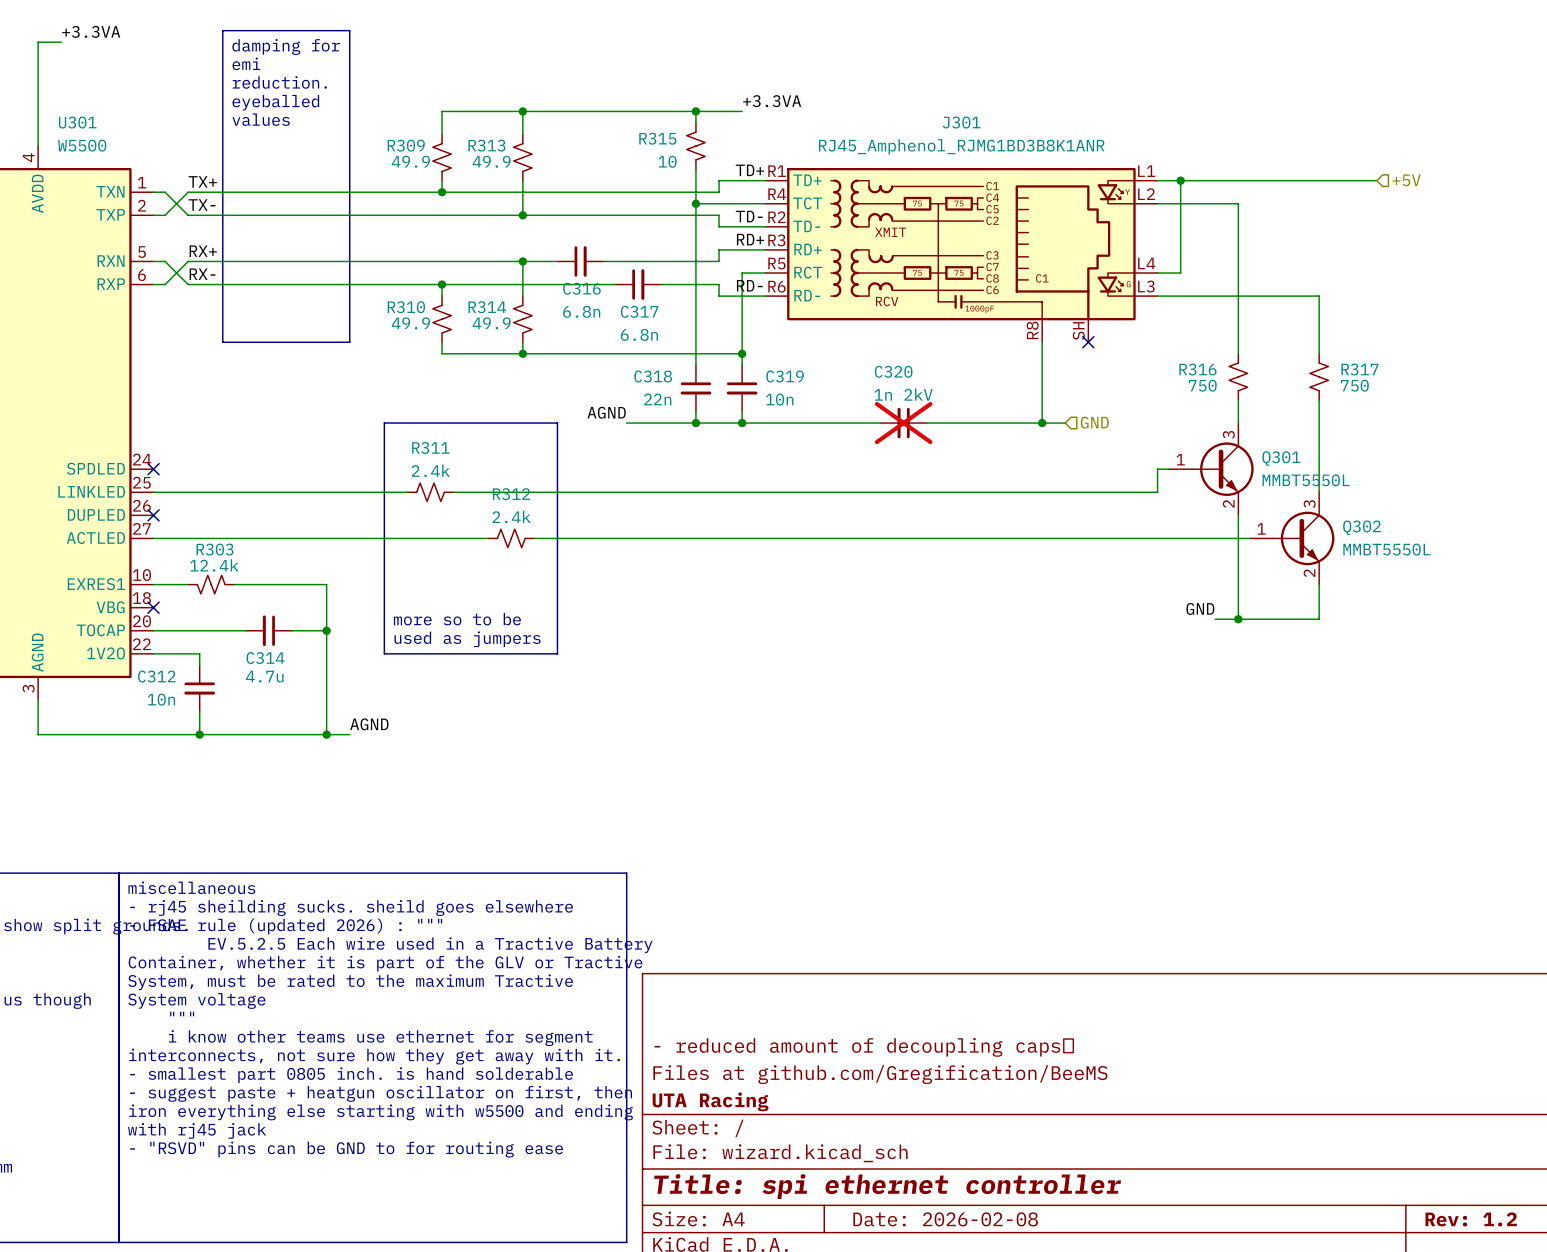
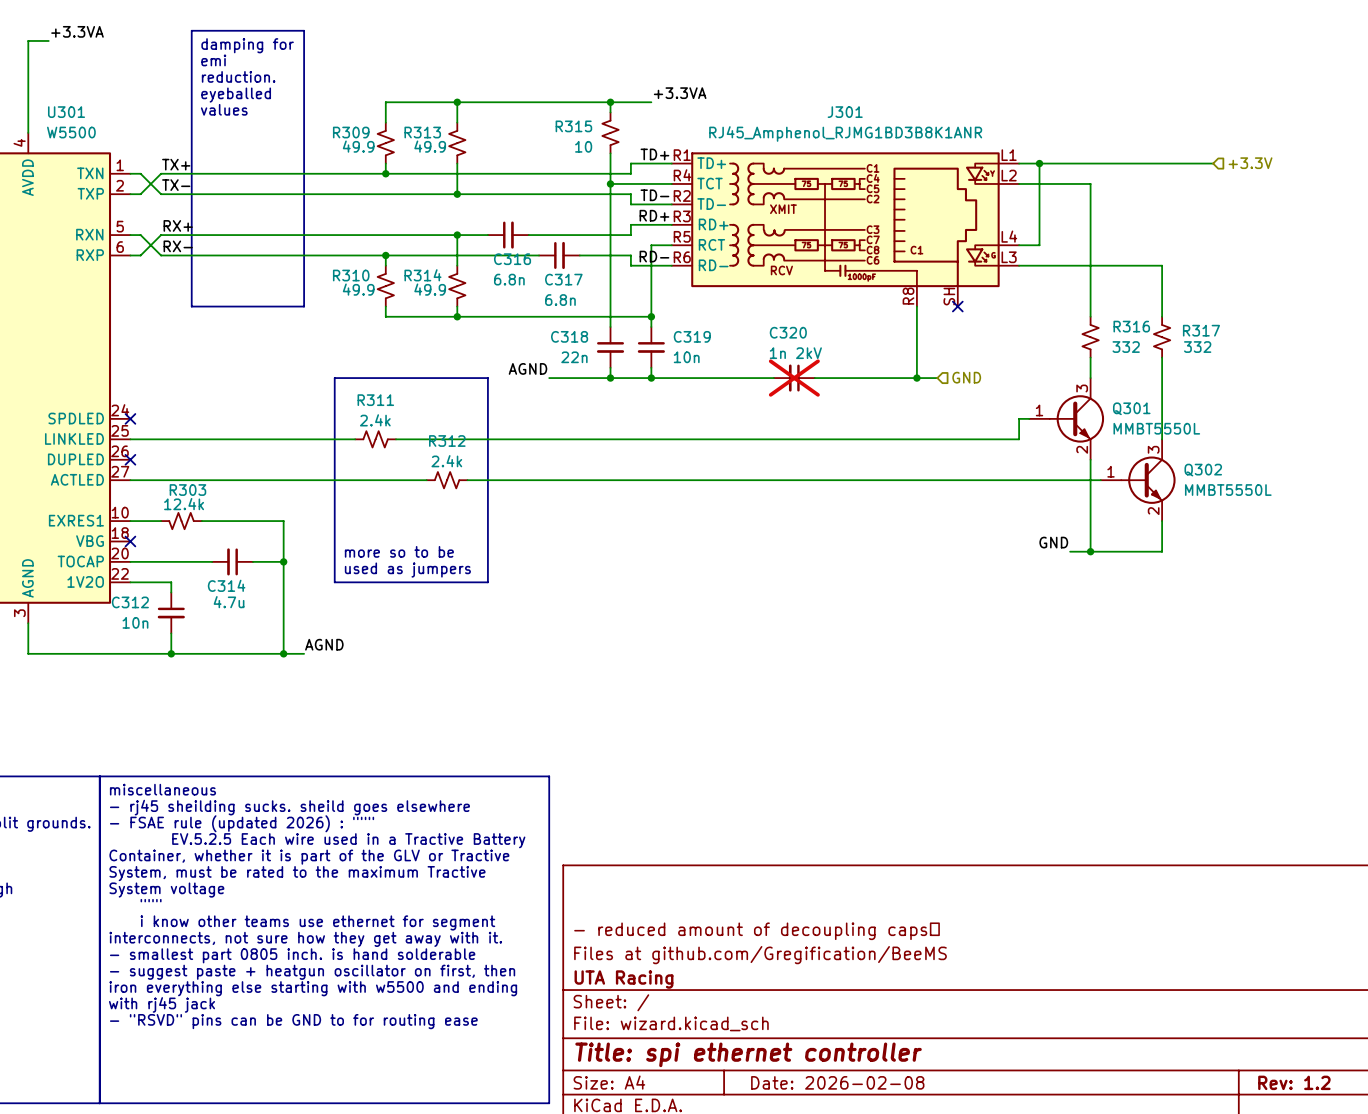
hierarchical label: +5V (1406, 180) -> +3.3V (1250, 163)
R316 flip: as is (1238, 376) -> left-right (1090, 337)
R316 value: 750 (1202, 385) -> 332 (1126, 347)
R317 value: 750 (1354, 385) -> 332 (1197, 347)

